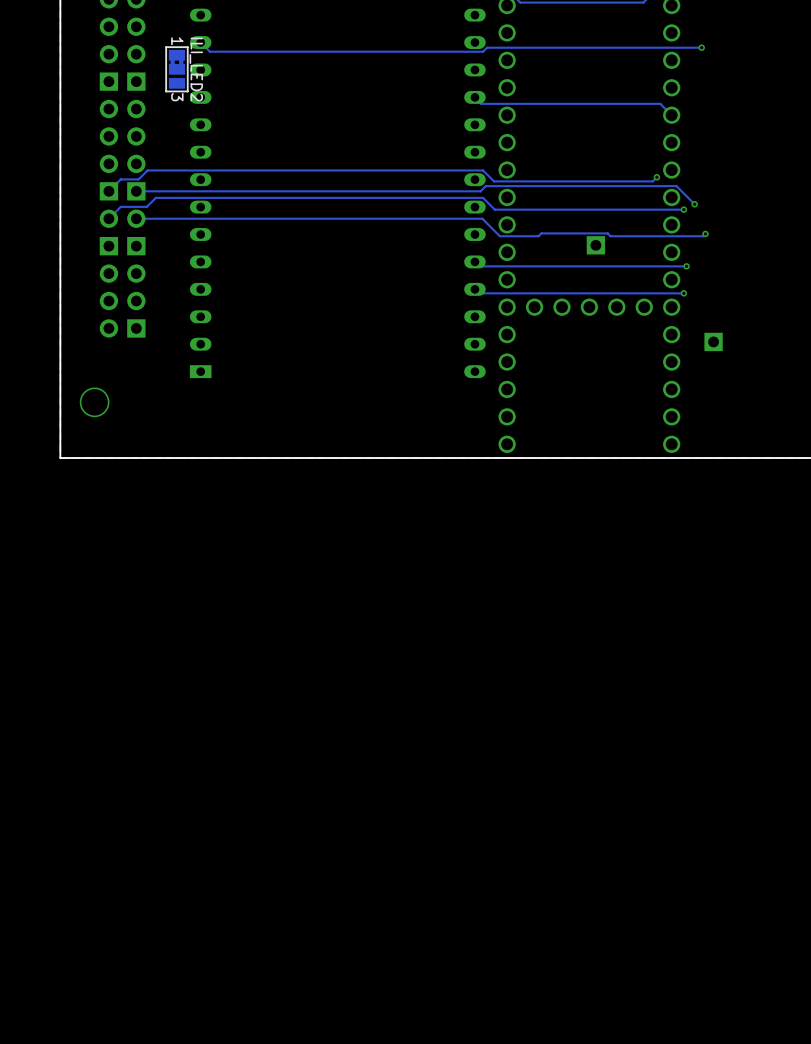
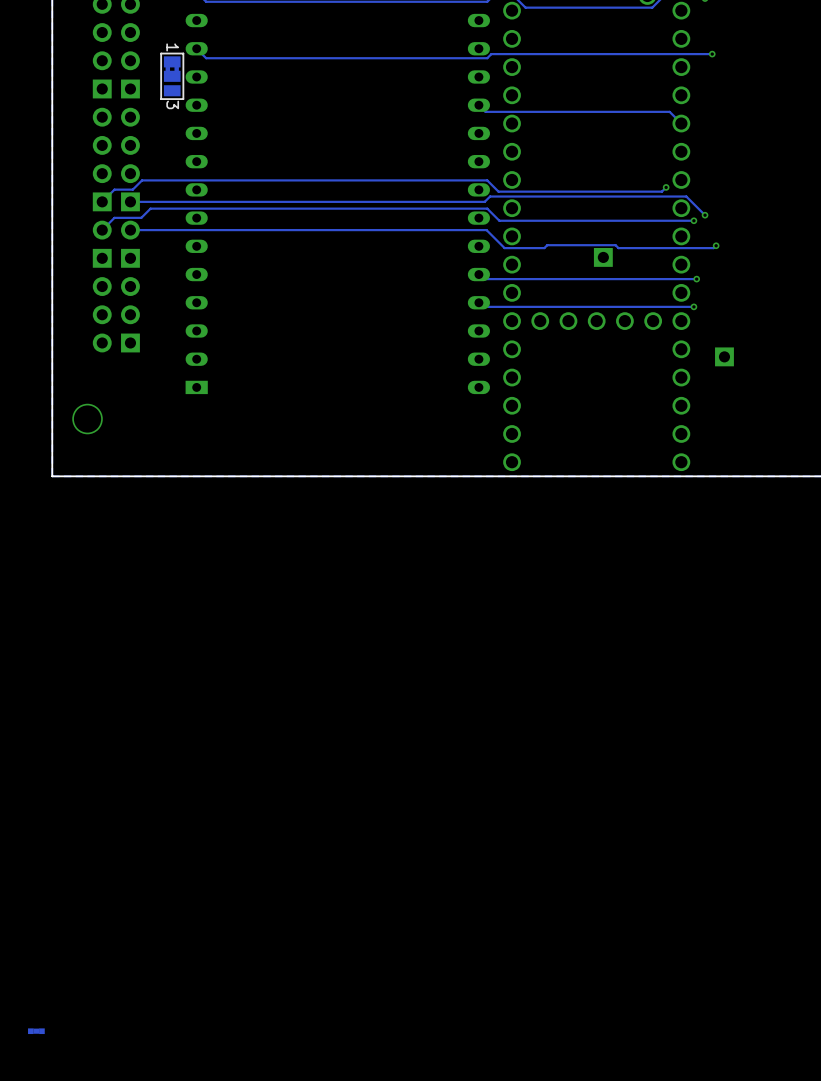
ILI_LED2 name: ILI_LED2 (196, 69) -> none
part: none -> (36, 1031)

